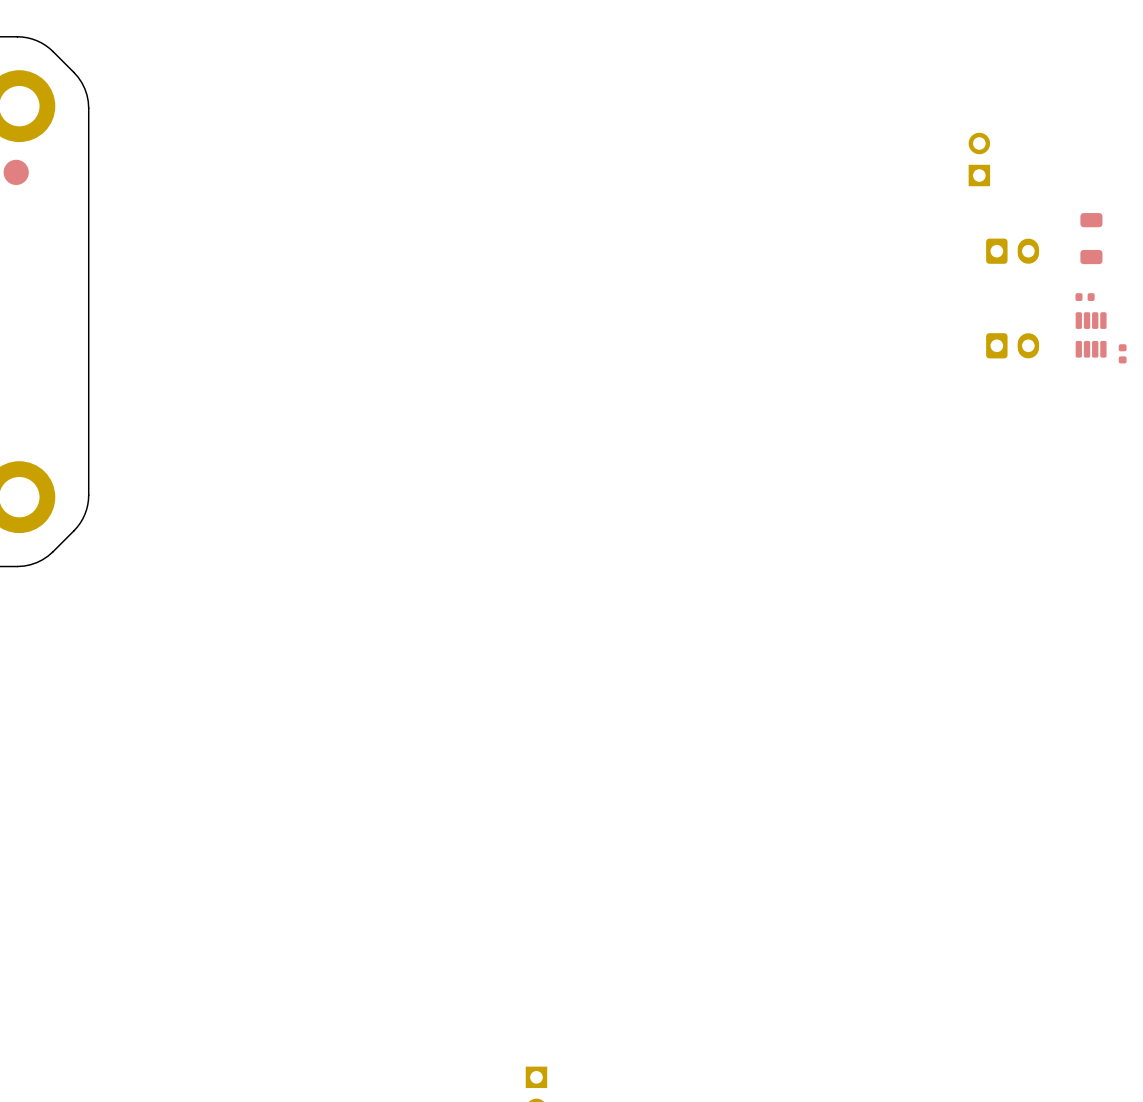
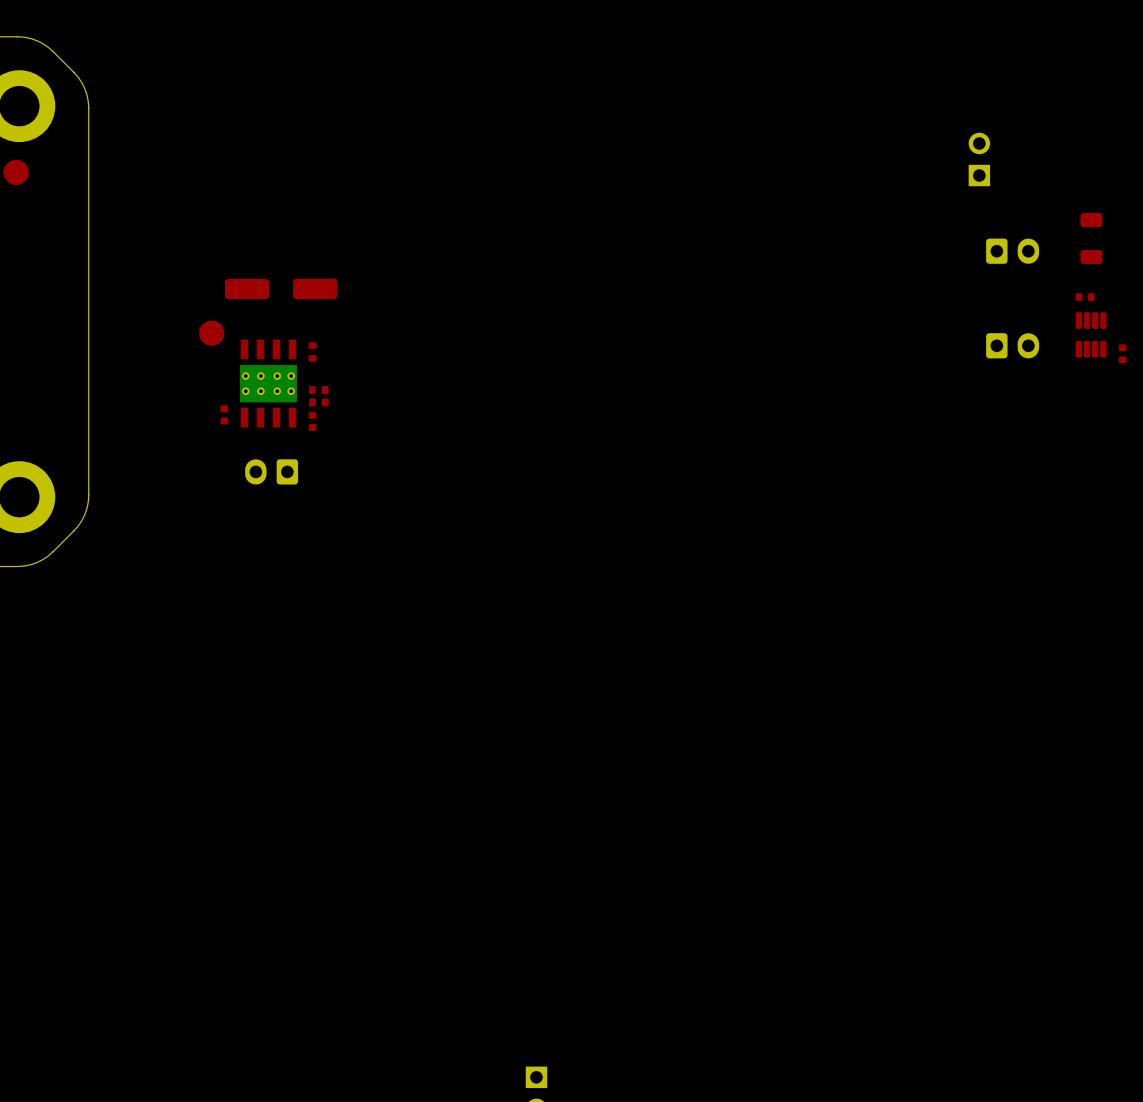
part: none -> (281, 289)
part: none -> (211, 333)
part: none -> (312, 351)
part: none -> (268, 383)
part: none -> (318, 390)
part: none -> (318, 402)
part: none -> (224, 414)
part: none -> (312, 421)
part: none -> (271, 471)

